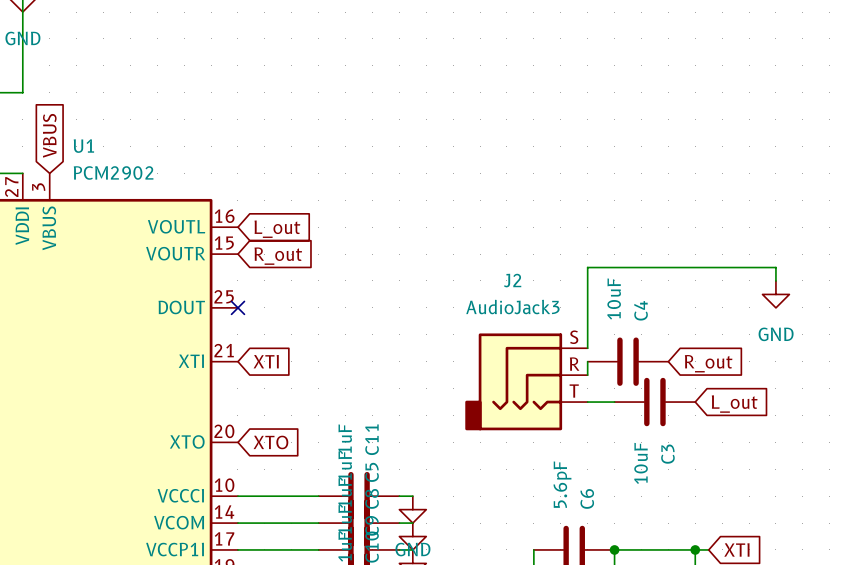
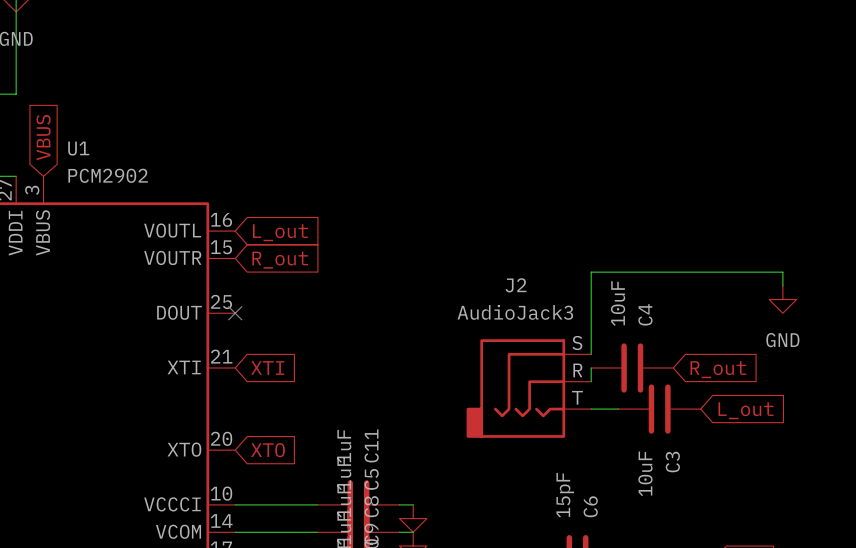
C6 value: 5.6pF (562, 484) -> 15pF (565, 495)

